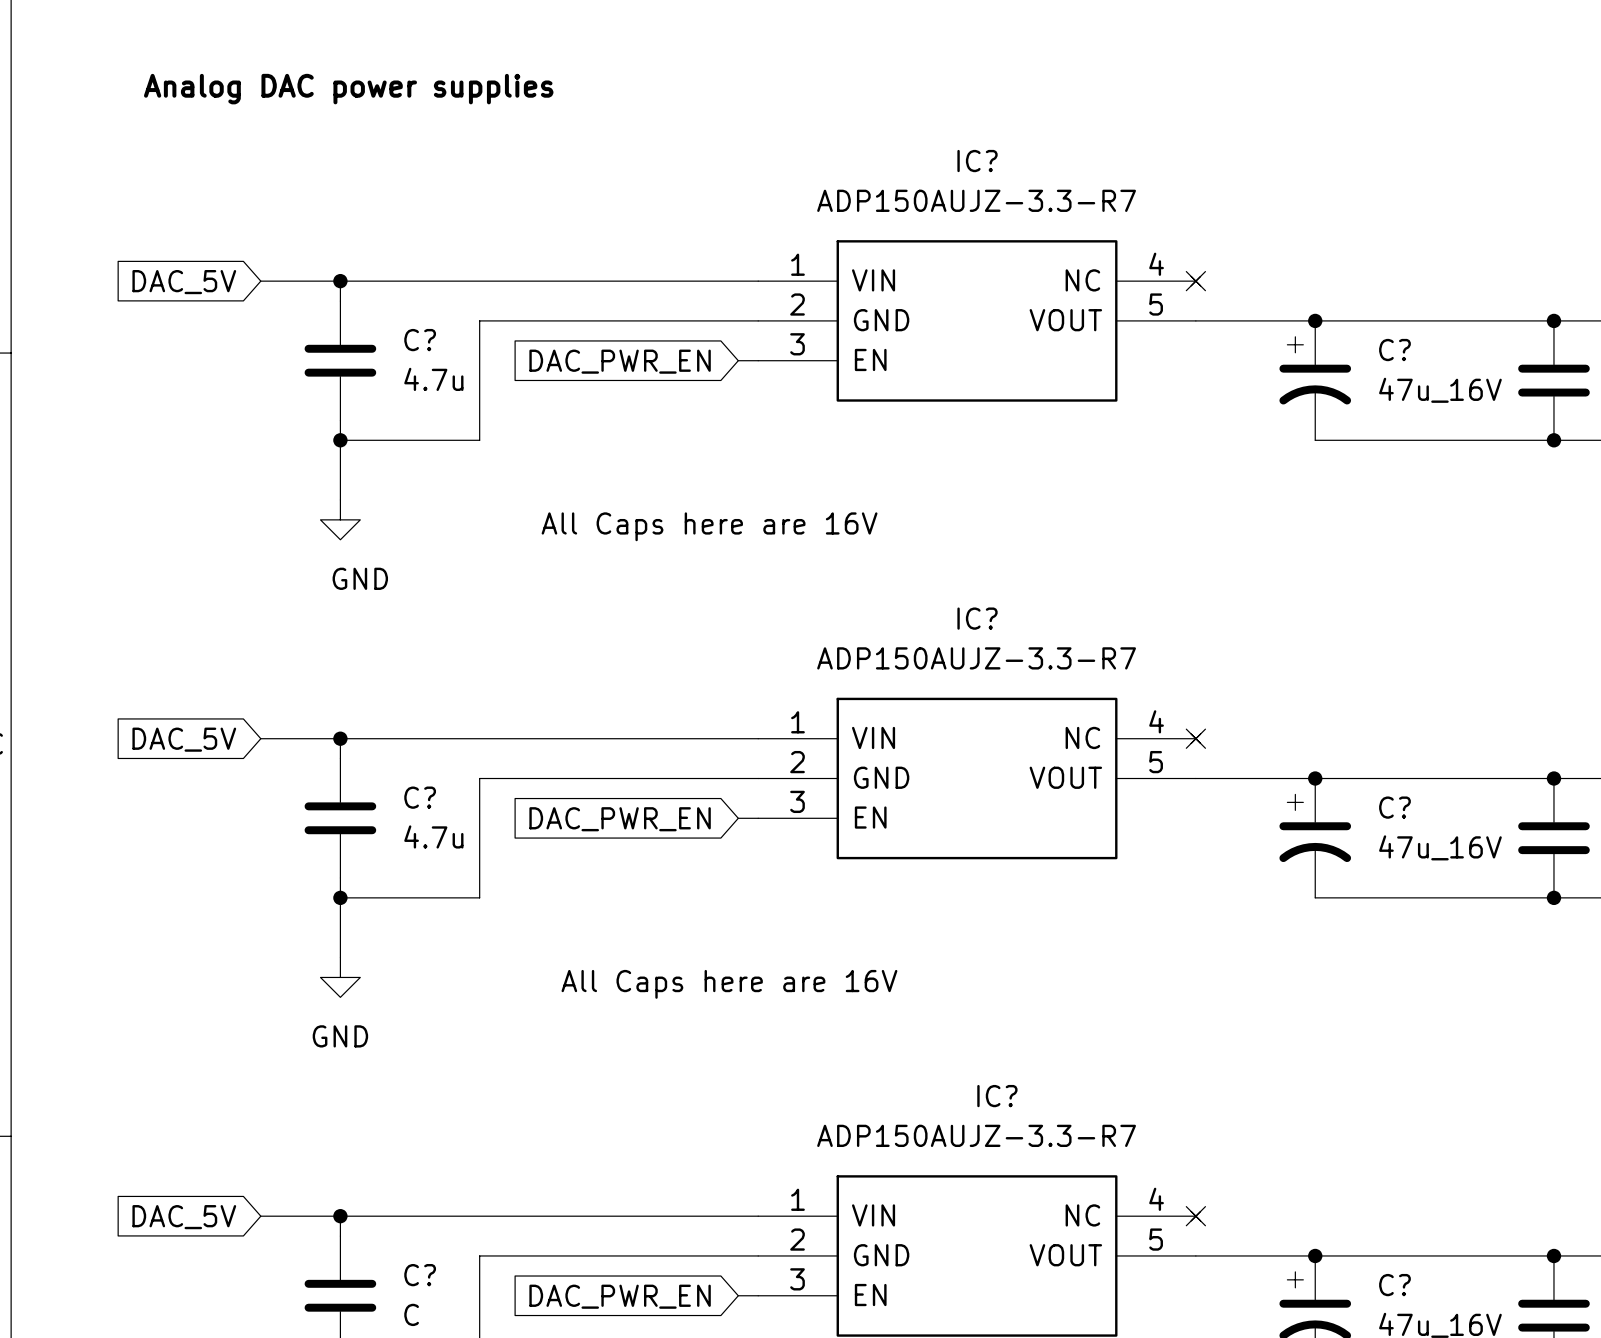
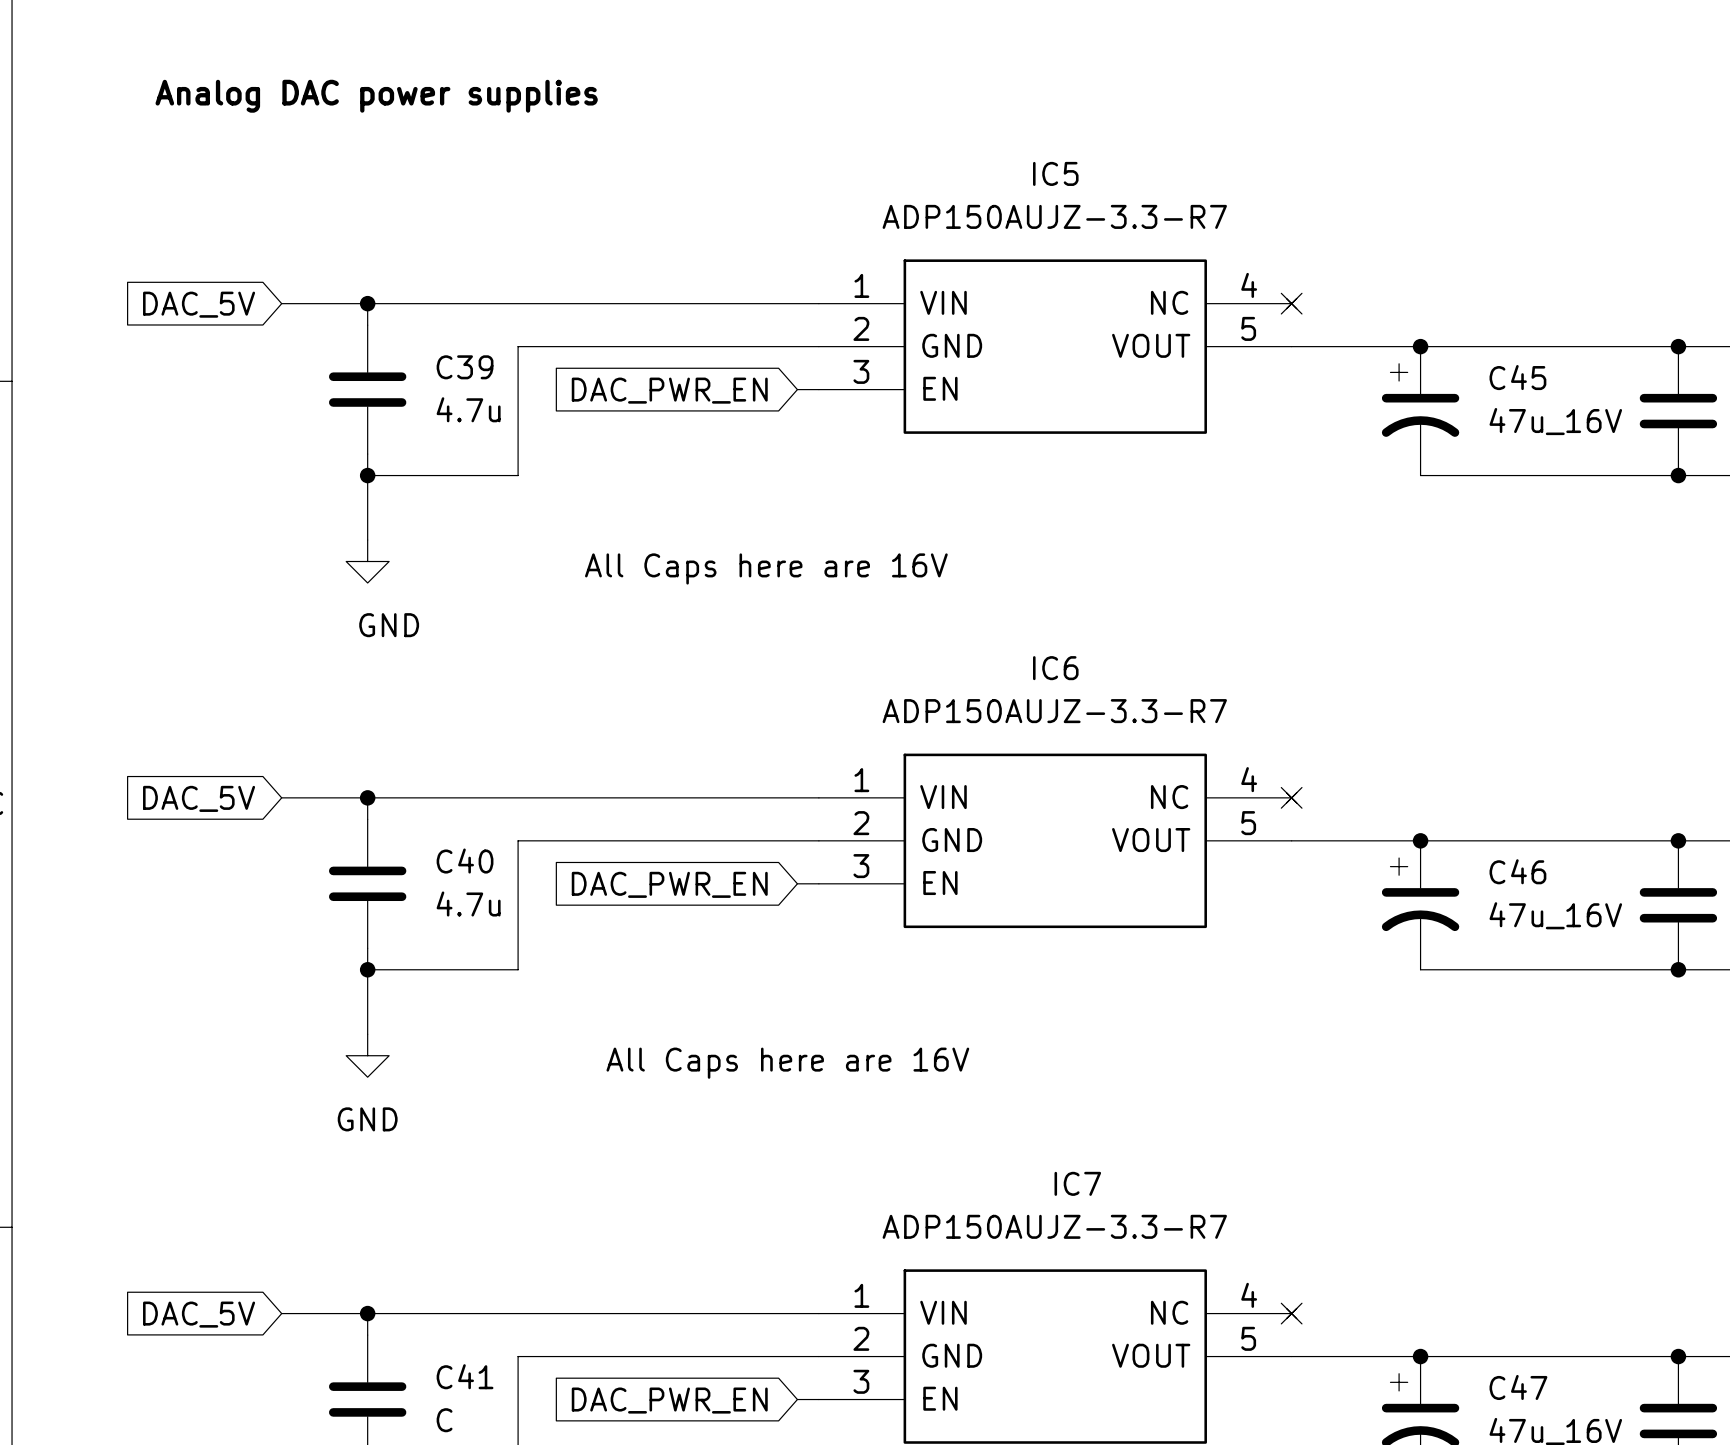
IC? name: IC? (977, 161) -> IC5 (1055, 173)
C? name: C? (420, 340) -> C39 (465, 367)
C? name: C? (1394, 350) -> C45 (1517, 377)
IC? name: IC? (977, 618) -> IC6 (1055, 668)
C? name: C? (420, 797) -> C40 (465, 861)
C? name: C? (1394, 807) -> C46 (1517, 871)
IC? name: IC? (997, 1096) -> IC7 (1077, 1183)
C? name: C? (420, 1275) -> C41 (465, 1376)
C? name: C? (1394, 1285) -> C47 (1518, 1387)

